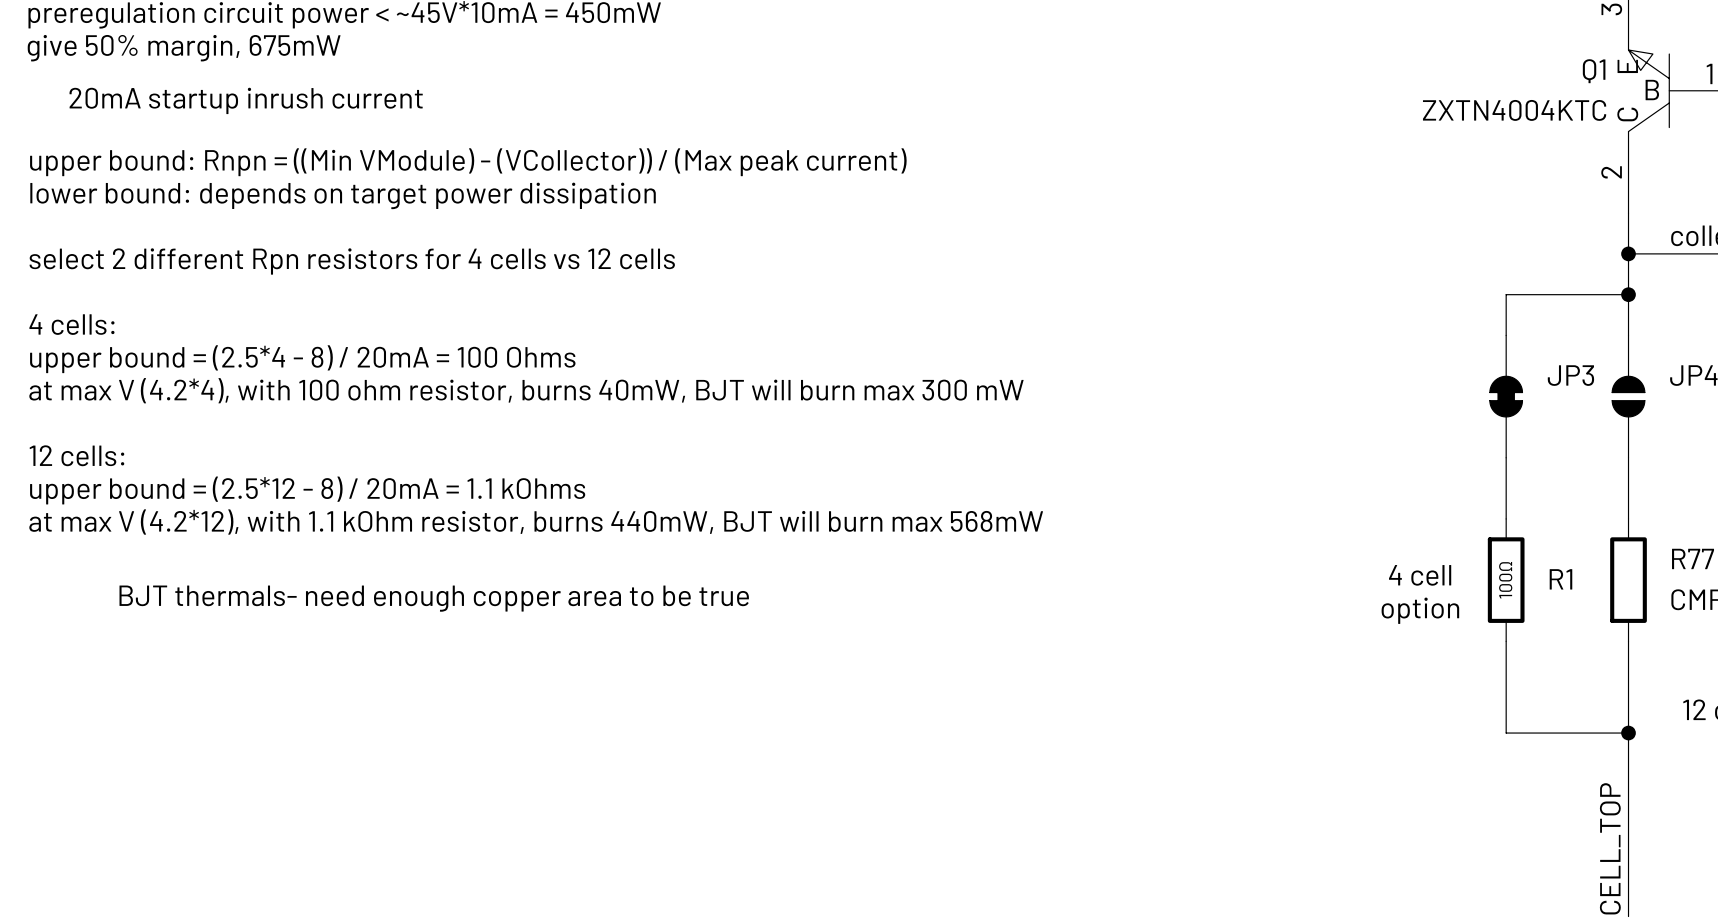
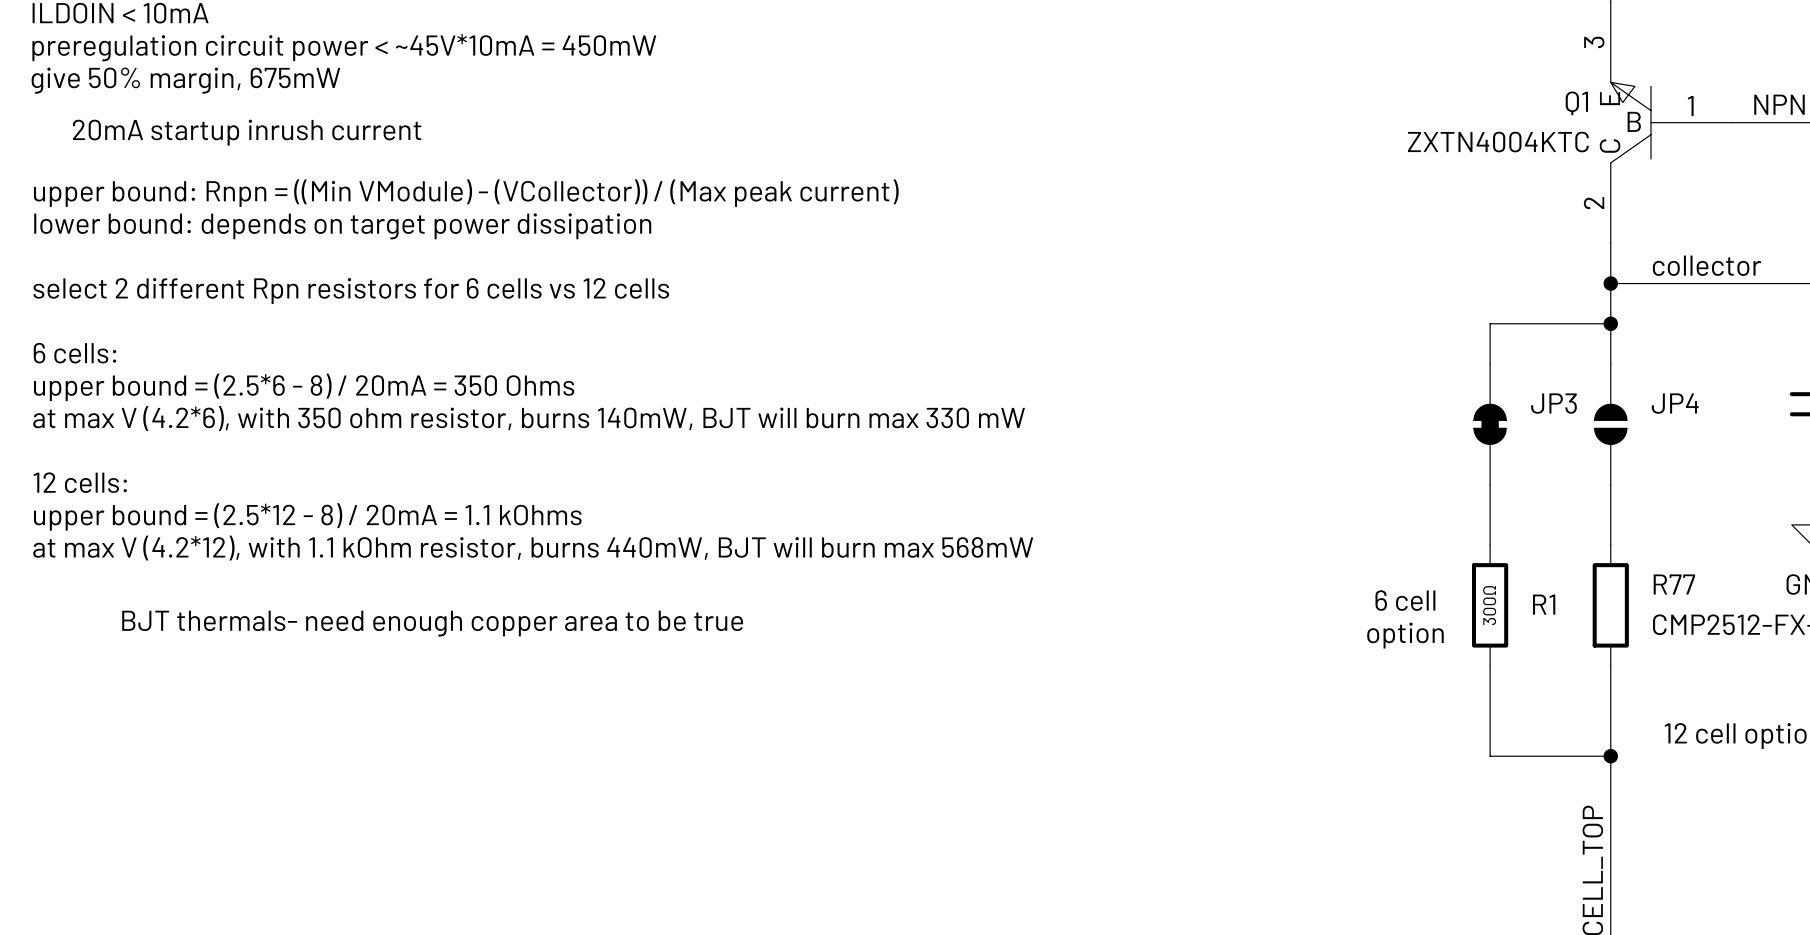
text: select 2 different Rpn resistors for 4 cells vs 12 cells (352, 261) -> select 2 different Rpn resistors for 6 cells vs 12 cells (351, 291)
text: 4 cells: (71, 324) -> 6 cells: (74, 353)
text: upper bound = (2.5*4 - 8) / 20mA = 100 Ohms (302, 359) -> upper bound = (2.5*6 - 8) / 20mA = 350 Ohms (304, 387)
text: at max V (4.2*4), with 100 ohm resistor, burns 40mW, BJT will burn max 300 mW (526, 390) -> at max V (4.2*6), with 350 ohm resistor, burns 140mW, BJT will burn max 330 mW (529, 418)
text: 4 cell (1420, 575) -> 6 cell (1405, 600)
R1 value: 100Ω (1505, 580) -> 300Ω (1489, 605)

